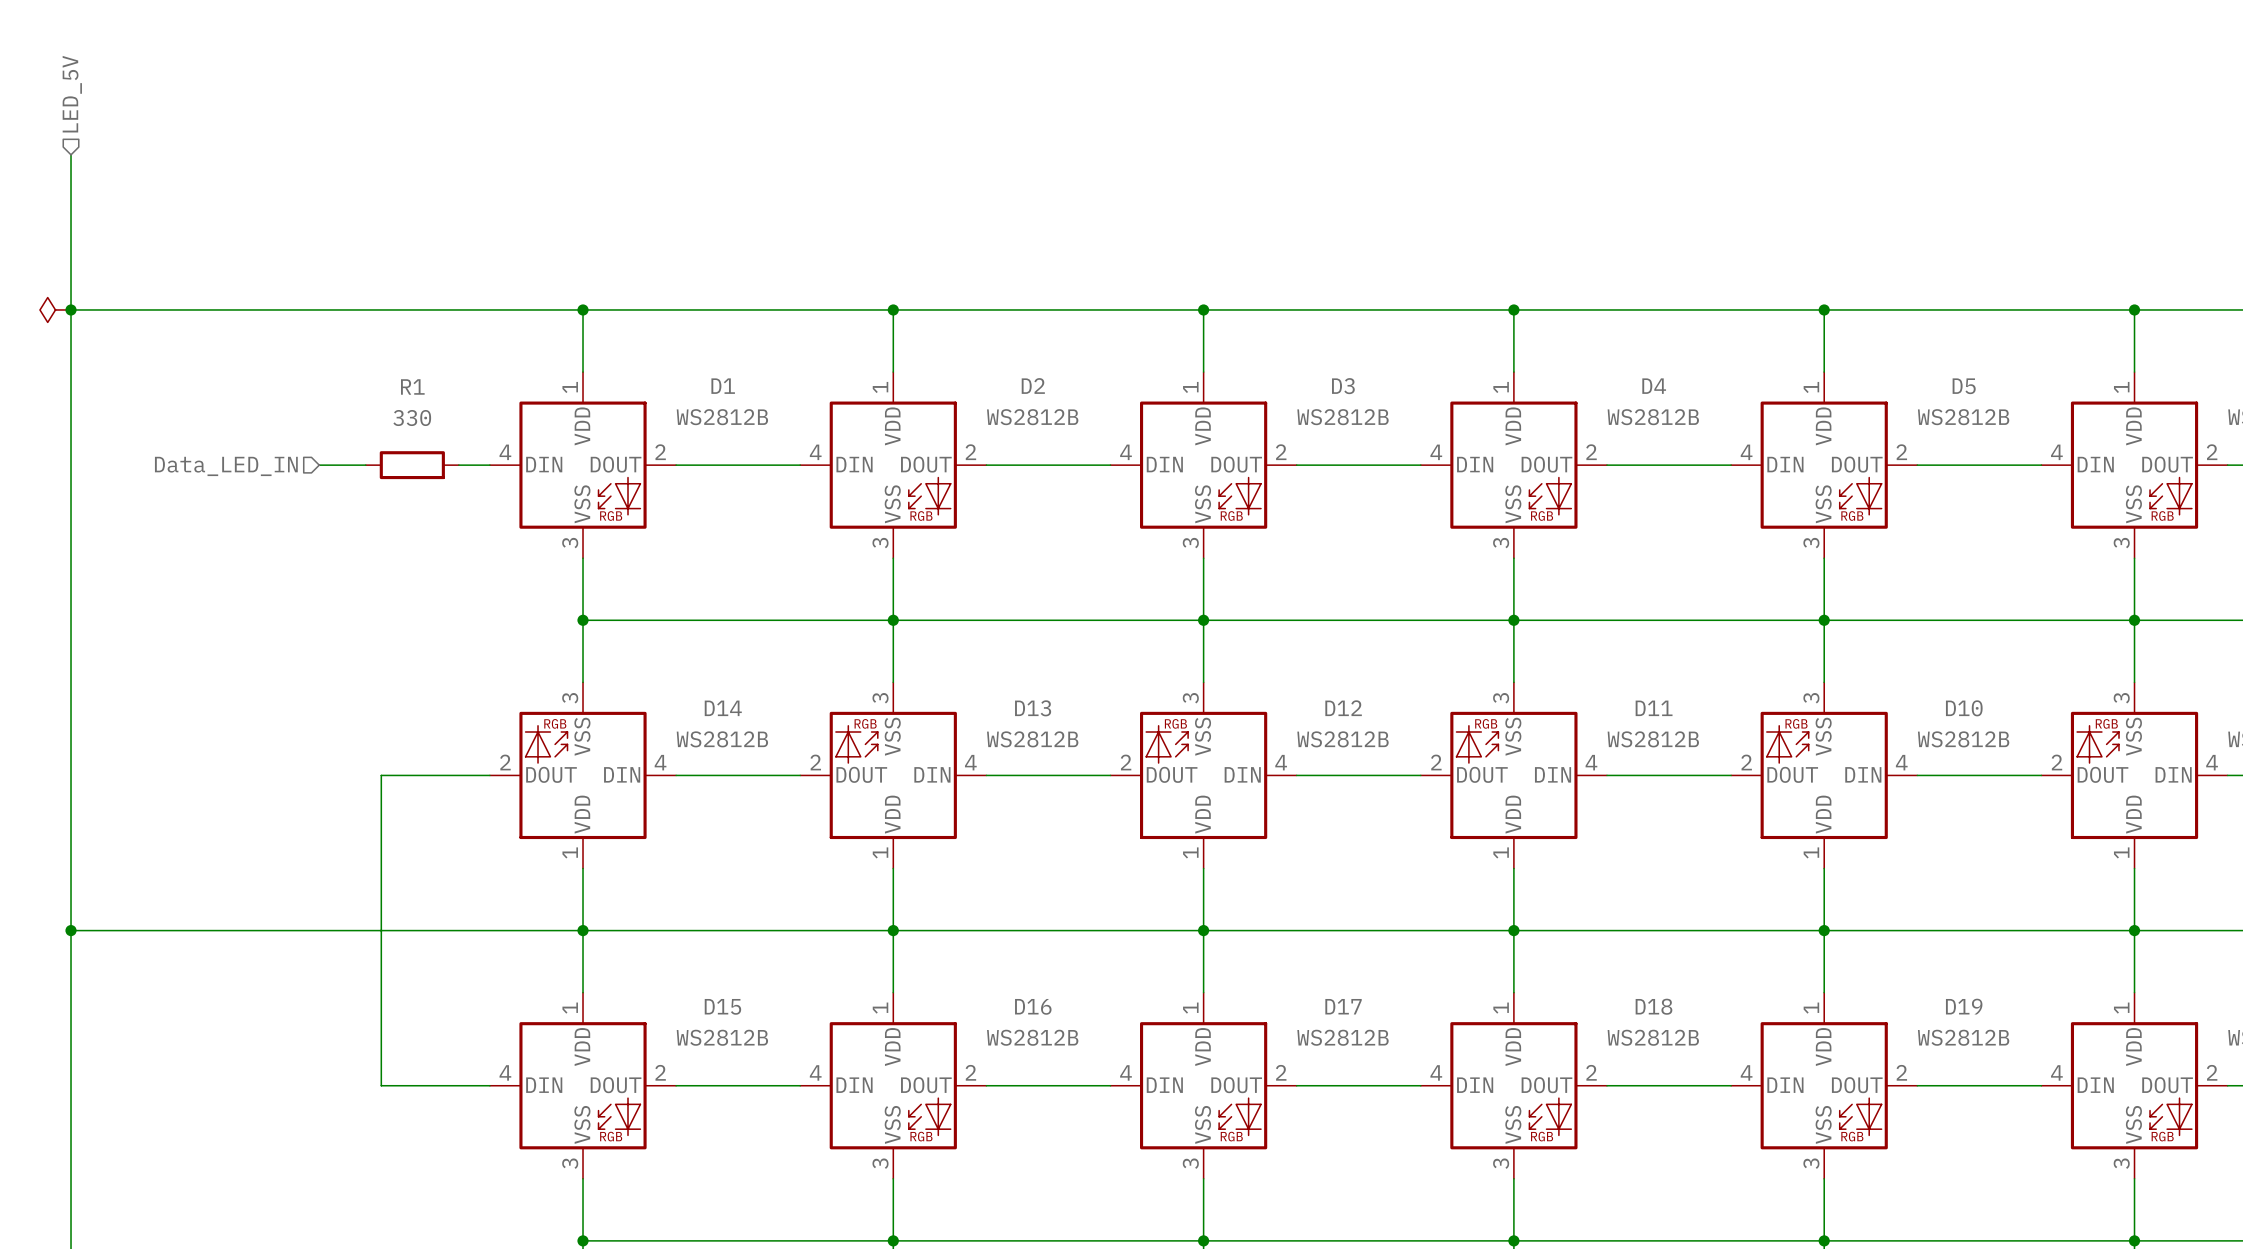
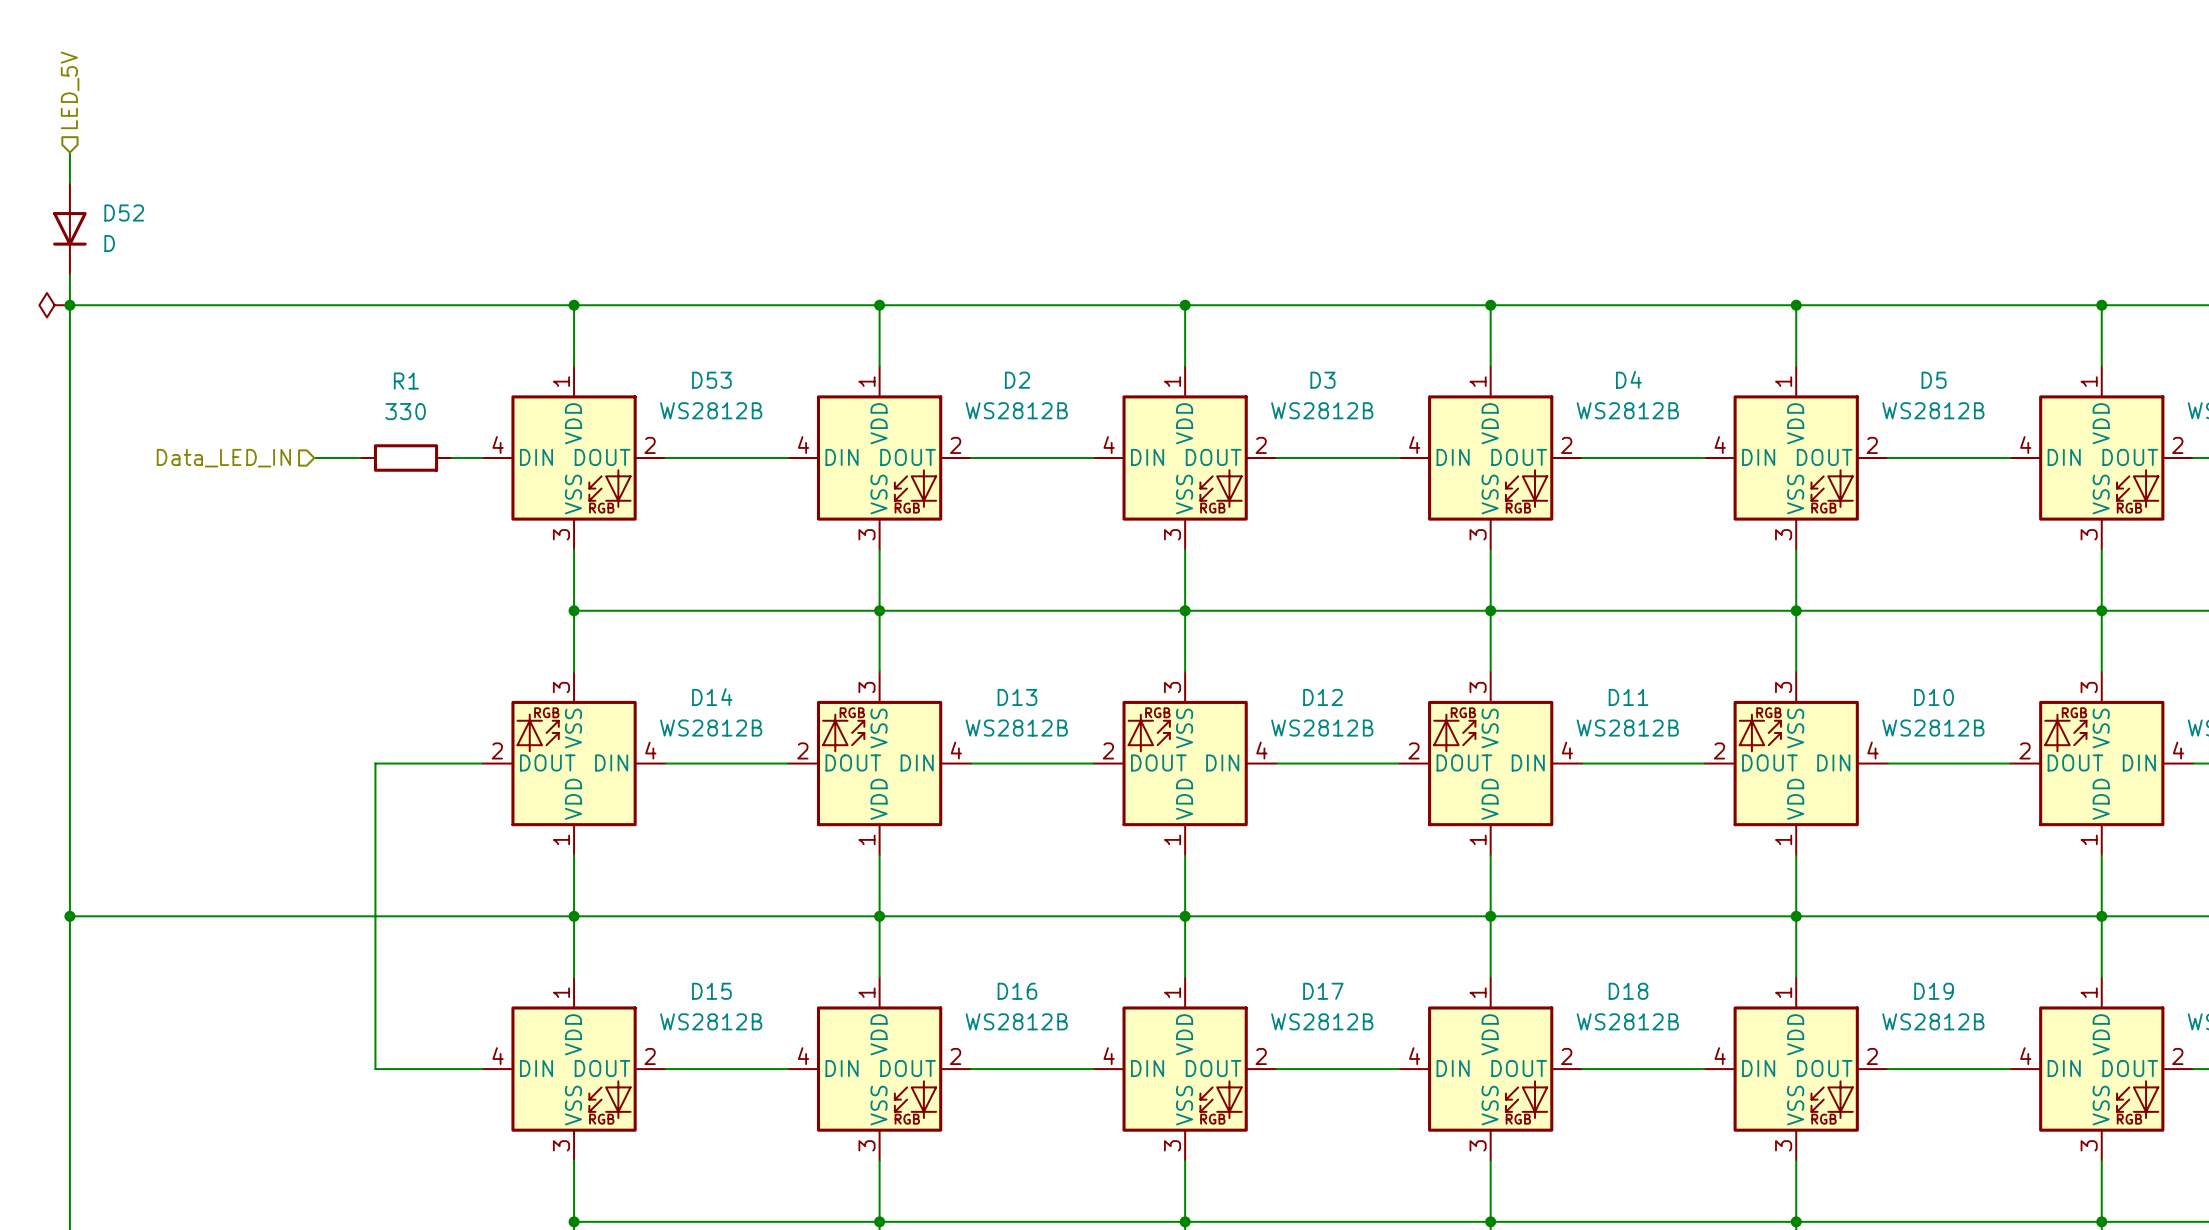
D52: none -> D (69, 228)
D1 name: D1 (723, 386) -> D53 (711, 380)

